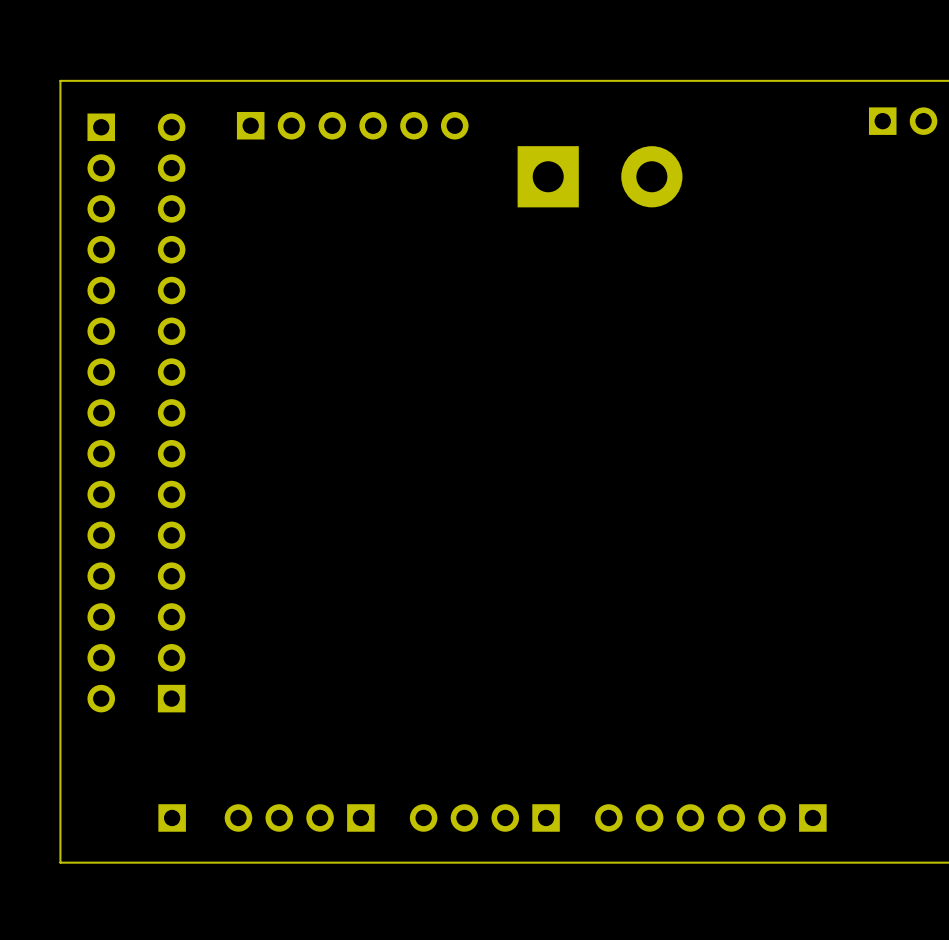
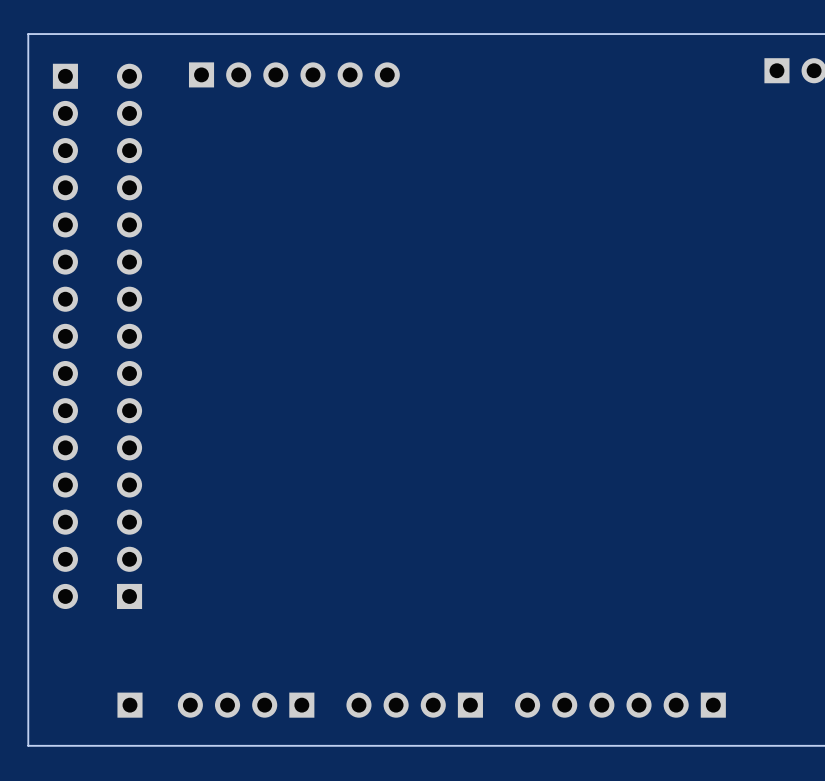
part: (600, 176) -> none

